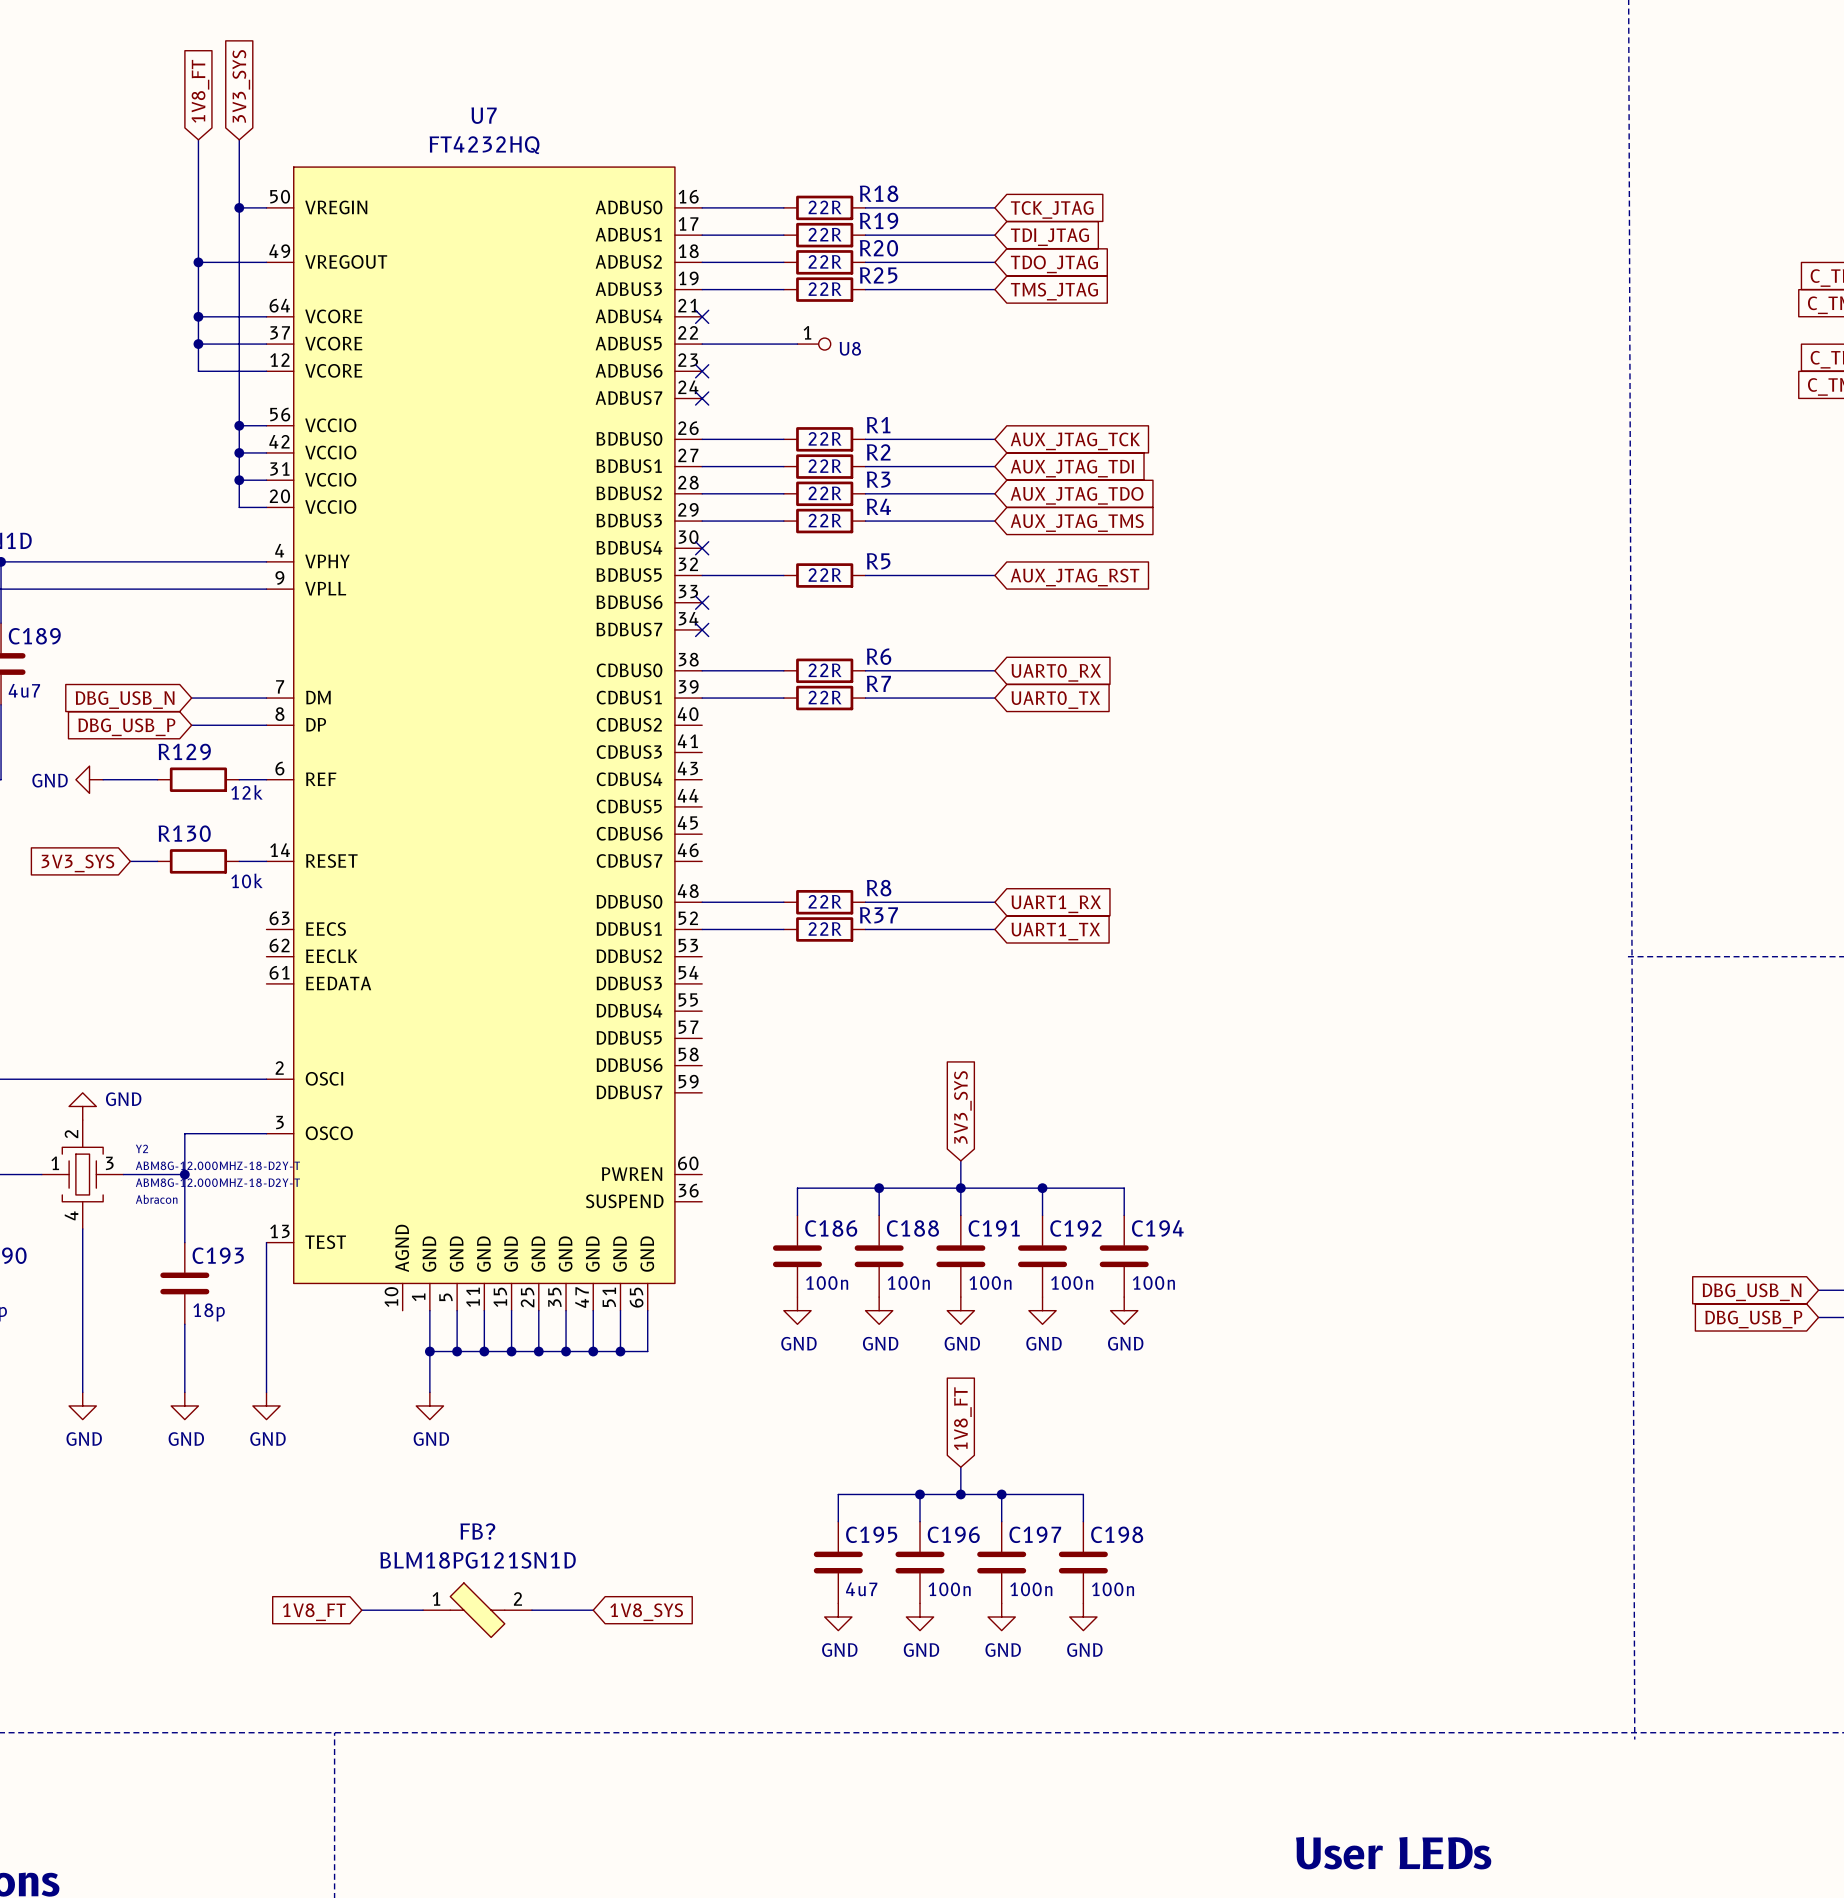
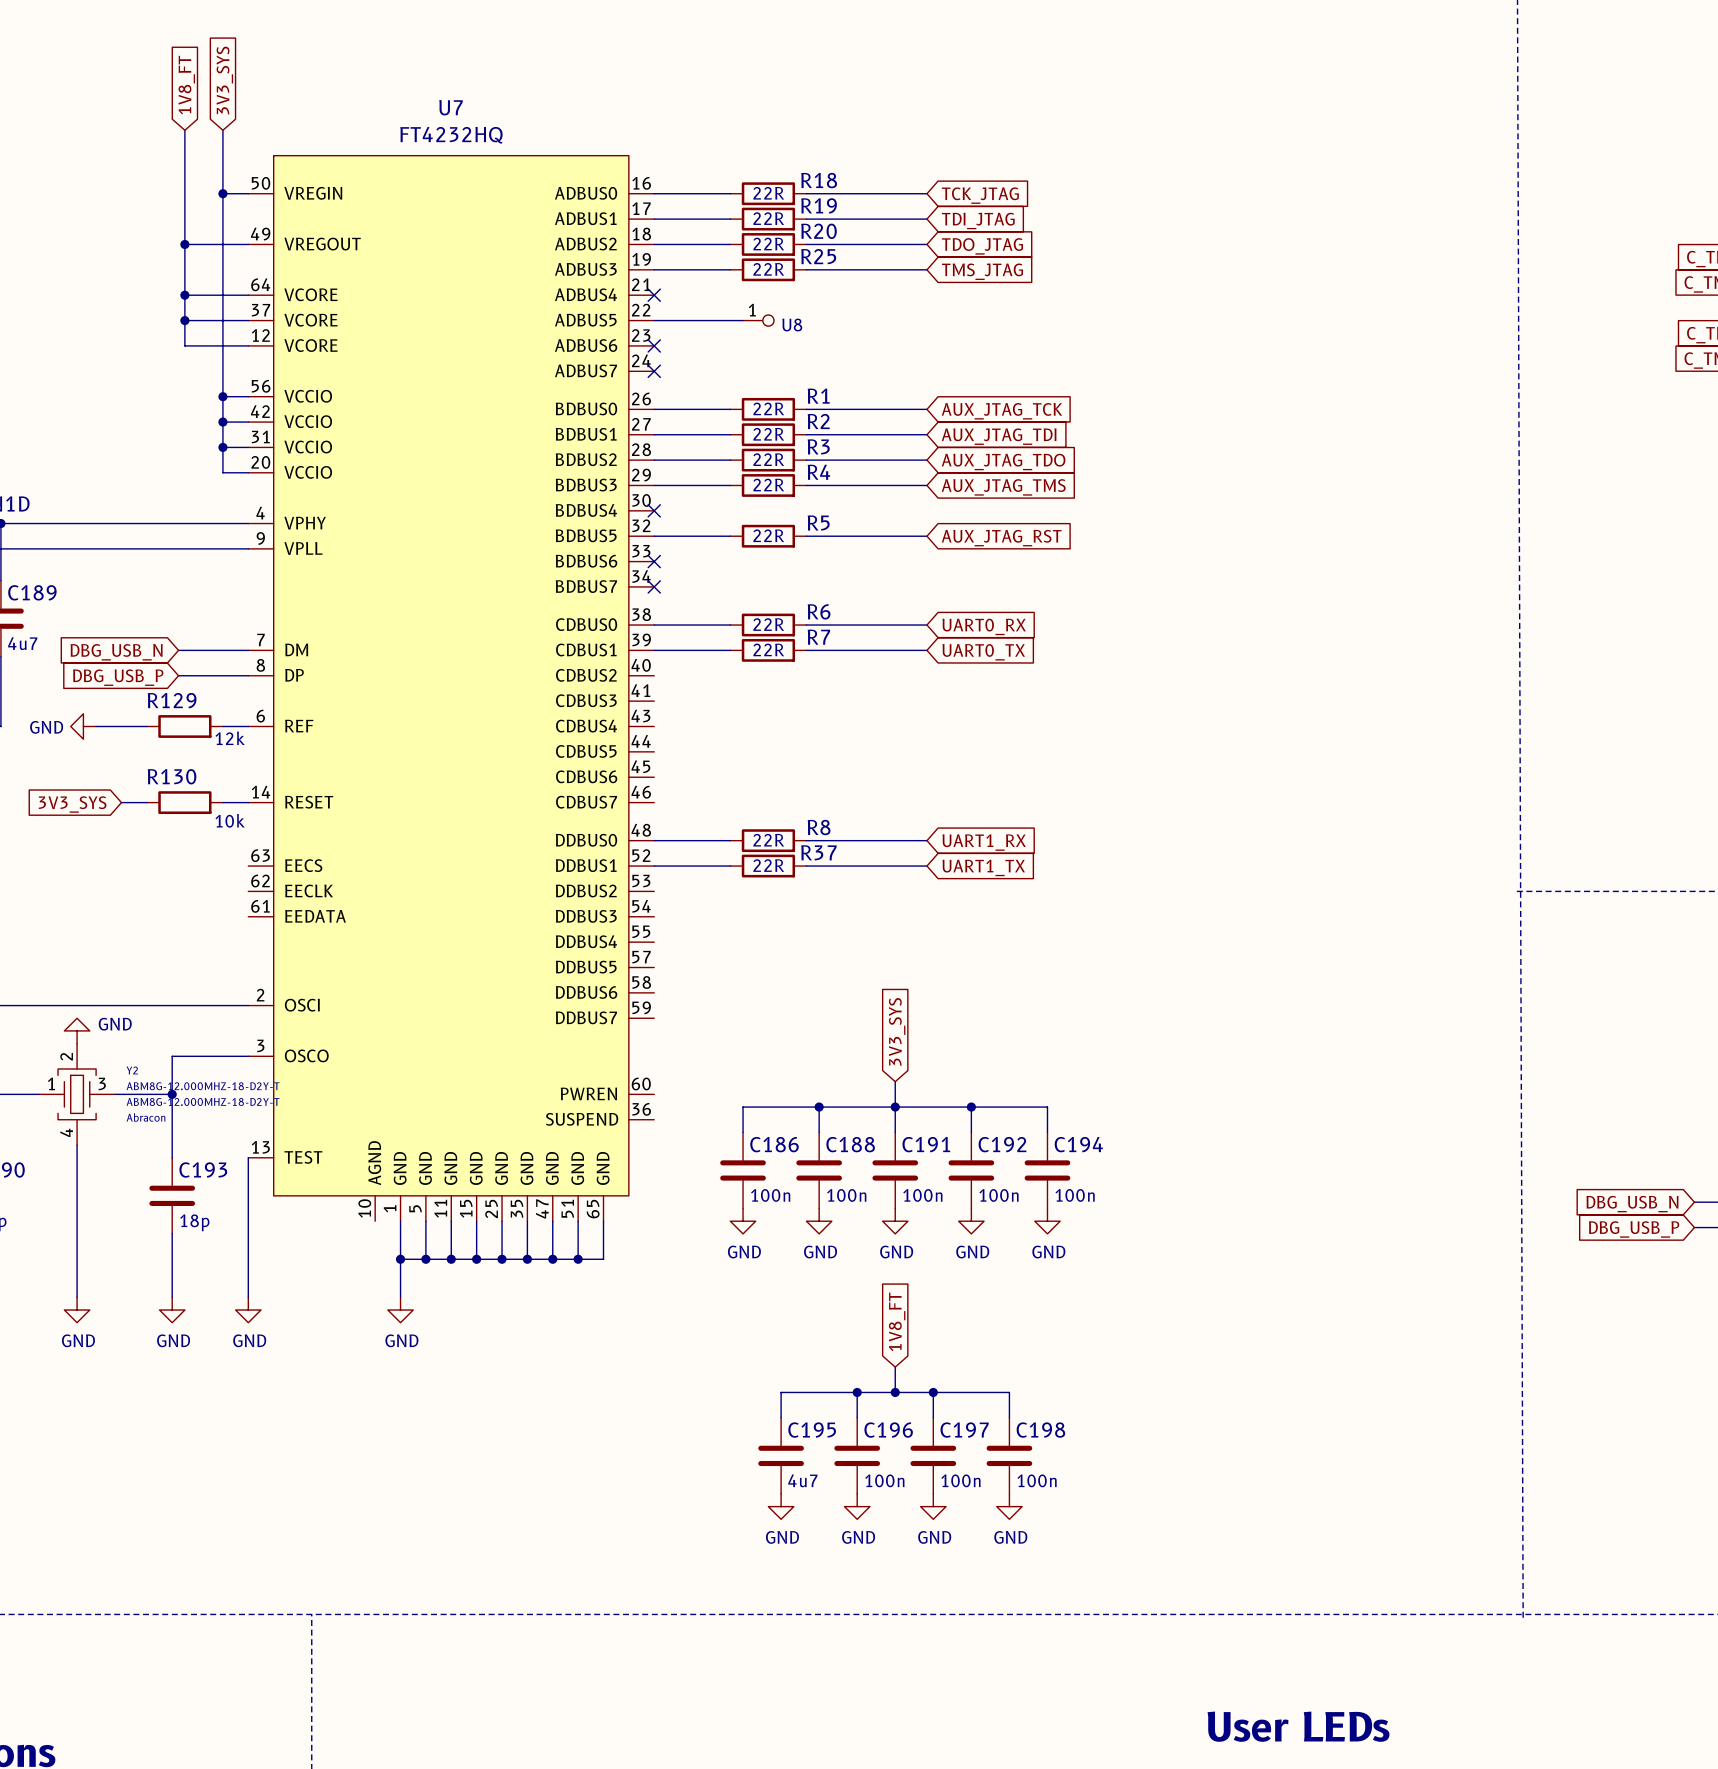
wire: (361, 1610) (423, 1610) -> none
FB?: BLM18PG121SN1D (477, 1610) -> none
wire: (531, 1610) (593, 1610) -> none
global label: 1V8_FT (314, 1612) -> none
global label: 1V8_SYS (646, 1612) -> none

